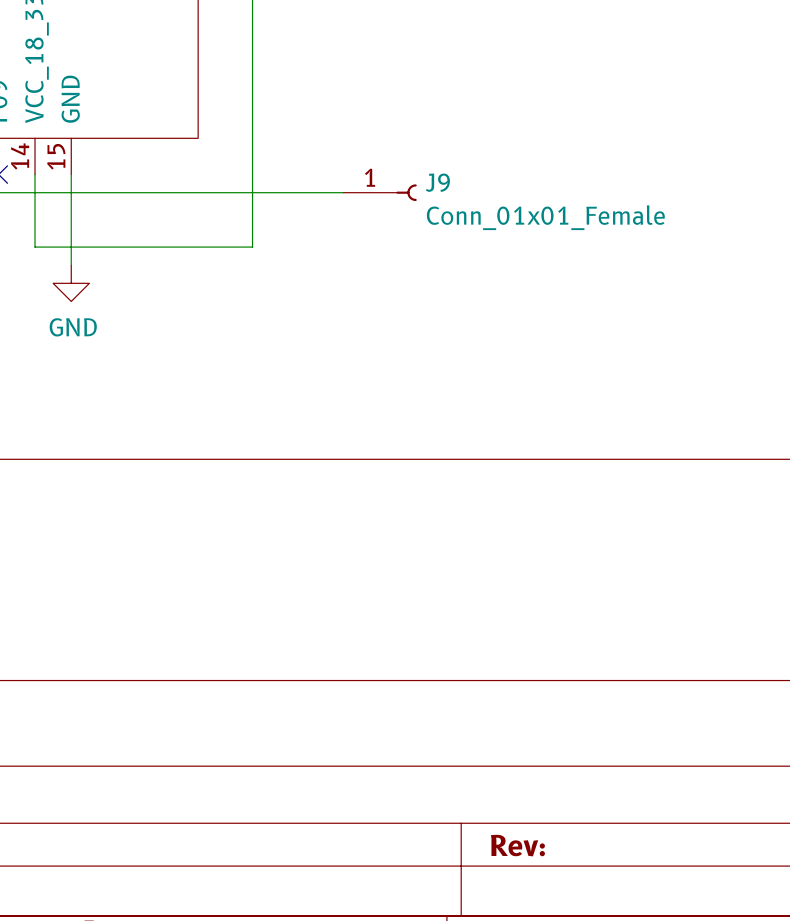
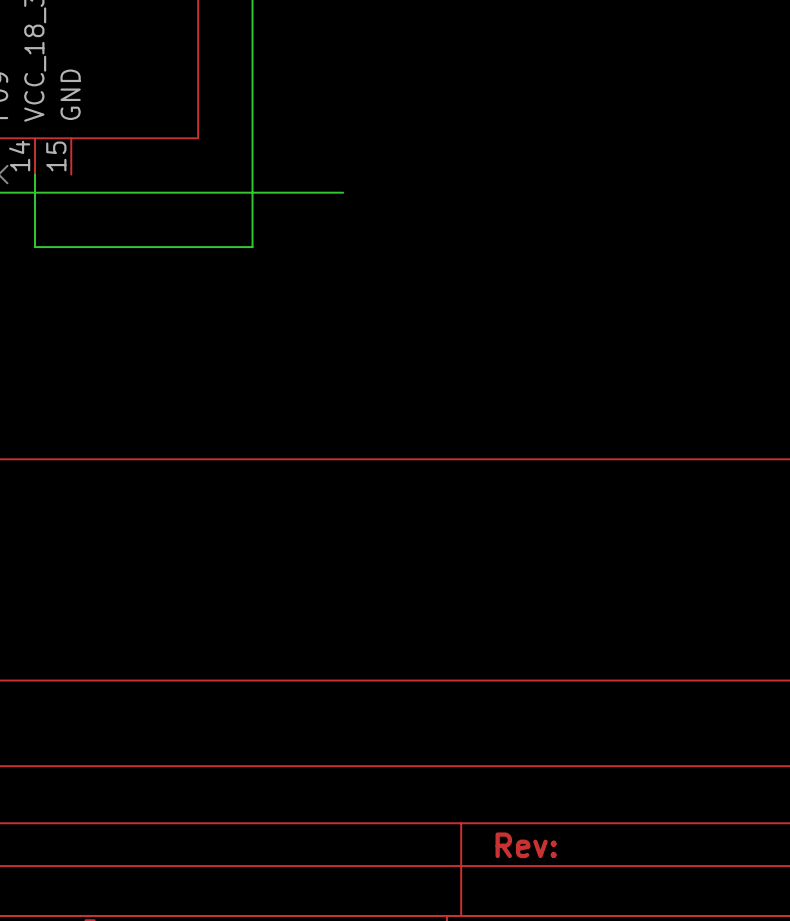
wire: (71, 174) (71, 265) -> none
J9: Conn_01x01_Female (379, 192) -> none
power symbol: GND (71, 283) -> none

